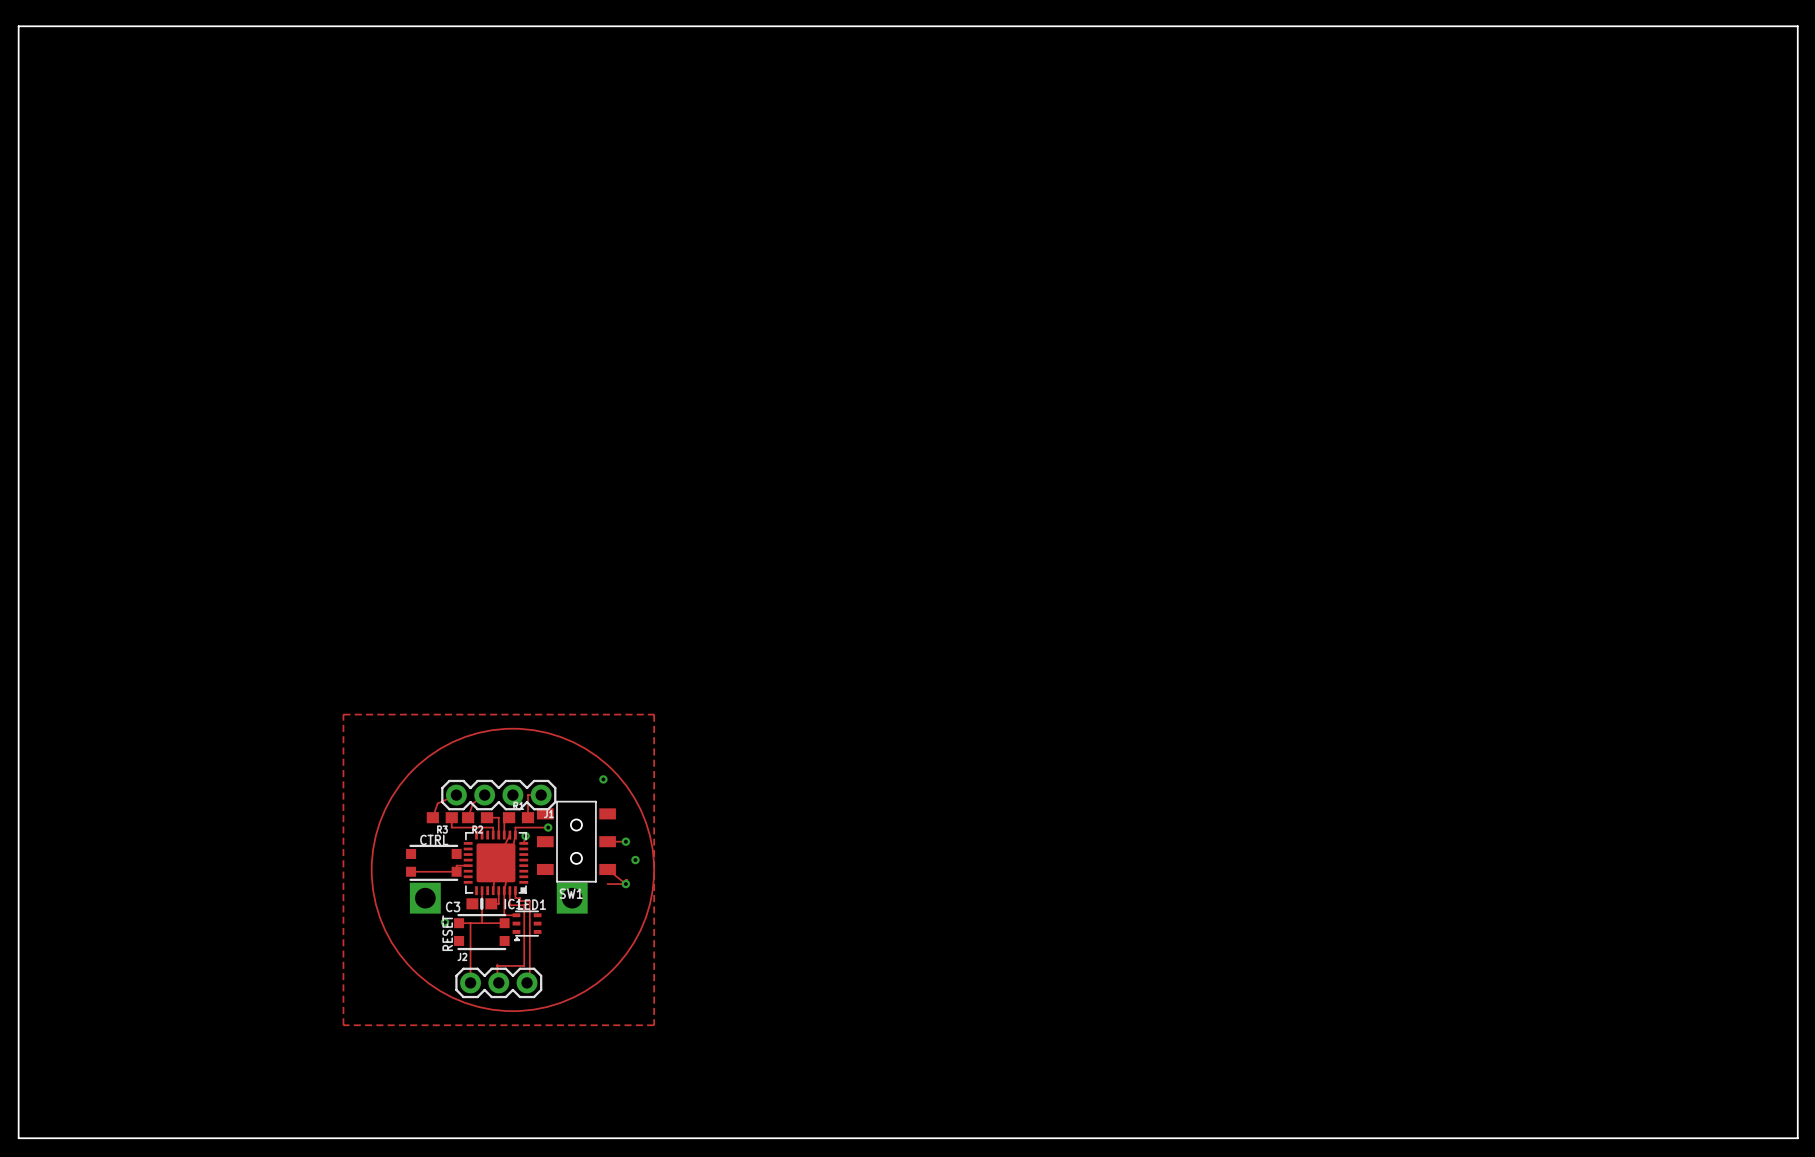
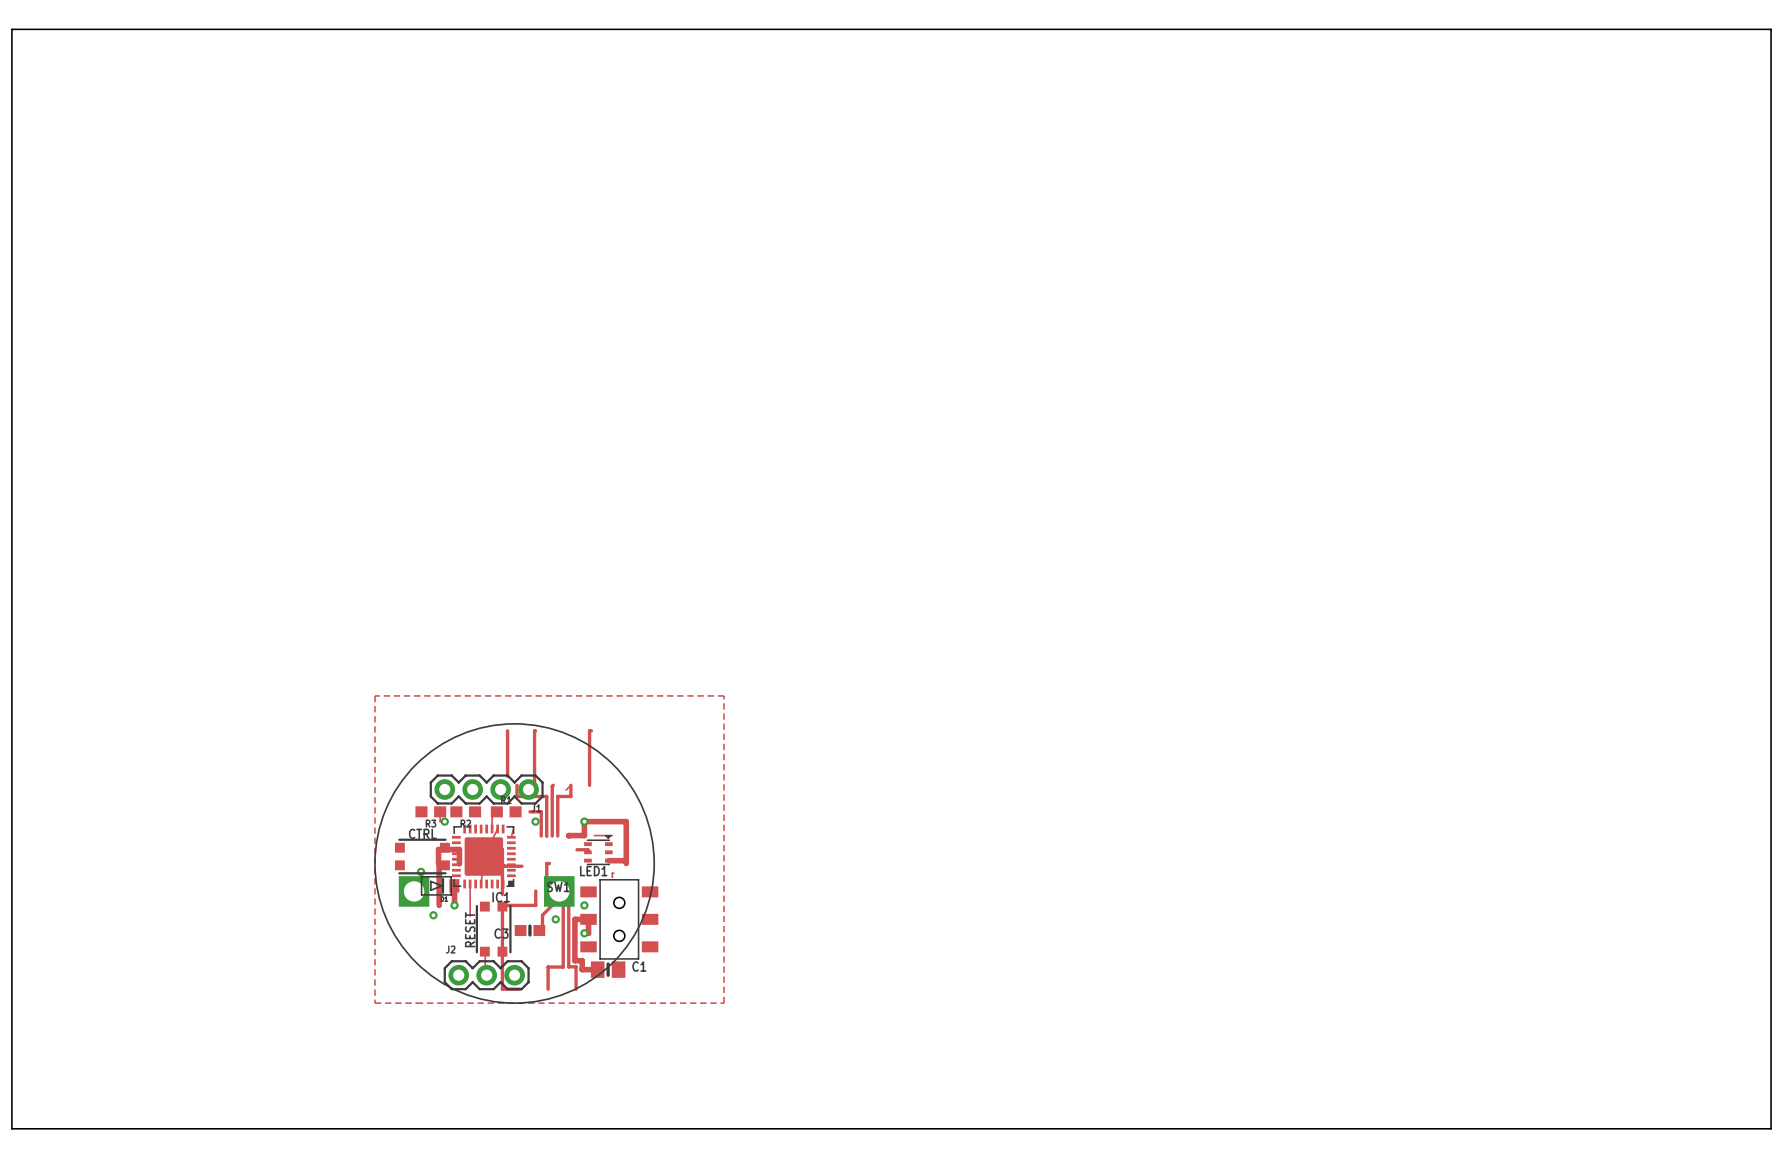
zone outline: (343, 714) (654, 714) (654, 1025) (343, 1025) (343, 714) -> (374, 695) (374, 1003) (724, 1003) (724, 695) (374, 695)
drawing: [370, 727, 655, 1012] -> none
drawing: none -> [374, 723, 656, 1004]
track: none -> (507, 730) (507, 776)
track: none -> (535, 730) (534, 785)
track: none -> (591, 730) (589, 730) (589, 785)
via: (603, 779) -> none
track: none -> (516, 785) (516, 796) (546, 796) (546, 836)
track: none -> (553, 785) (552, 836)
track: (456, 795) (437, 803) (432, 817) -> none
track: (484, 795) (472, 803) (468, 817) -> none
track: (541, 795) (528, 795) (528, 817) -> none
track: none -> (566, 790) (570, 785) (570, 796) (557, 796) (557, 836)
track: (487, 817) (498, 817) (498, 835) -> none
track: none -> (529, 811) (541, 811) (541, 836)
track: (456, 827) (493, 827) (493, 835) -> none
via: none -> (444, 821)
track: (548, 827) (515, 827) (504, 890) (504, 915) (516, 915) -> none
via: none -> (584, 821)
via: (525, 836) -> none
SW1 position: (576, 841) -> (619, 919)
via: (625, 841) -> none
track: none -> (568, 836) (584, 835) (584, 821) (626, 821) (626, 863)
track: none -> (502, 849) (502, 894)
track: none -> (576, 849) (587, 849) (587, 852)
via: (635, 860) -> none
track: (468, 865) (456, 865) (456, 871) (411, 871) -> none
track: none -> (608, 860) (626, 860)
track: none -> (502, 863) (504, 866) (522, 866)
track: none -> (549, 863) (546, 863) (546, 890)
track: (607, 869) (625, 884) (607, 884) -> none
track: none -> (459, 863) (459, 849) (438, 849) (439, 905)
via: none -> (421, 871)
via: (625, 884) -> none
track: (498, 890) (498, 903) (491, 903) -> none
track: (509, 890) (509, 905) (524, 905) (524, 965) (497, 965) -> none
track: (515, 890) (515, 898) (519, 898) (519, 900) (529, 900) (529, 980) (527, 982) -> none
part: none -> (436, 885)
track: none -> (454, 885) (454, 905)
track: none -> (535, 890) (535, 905) (502, 905) (502, 989) (520, 989)
track: none -> (552, 890) (552, 905) (542, 915) (542, 930) (539, 930)
track: none -> (563, 890) (563, 967) (548, 967) (548, 989)
track: none -> (568, 890) (568, 966) (576, 966) (576, 989)
C3 position: (481, 903) -> (529, 930)
via: none -> (454, 905)
via: none -> (584, 905)
track: (459, 923) (504, 923) -> none
track: (470, 923) (470, 982) -> none
LED1 rotation: 0° (527, 925) -> 180° (598, 850)
LED1 position: (527, 925) -> (598, 850)
via: none -> (555, 919)
RESET rotation: 0° (481, 932) -> 90° clockwise (493, 929)
track: none -> (584, 933) (588, 933) (588, 919) (574, 919) (574, 960) (582, 960) (582, 969) (597, 969)
via: none -> (584, 933)
C1: none -> (608, 969)

